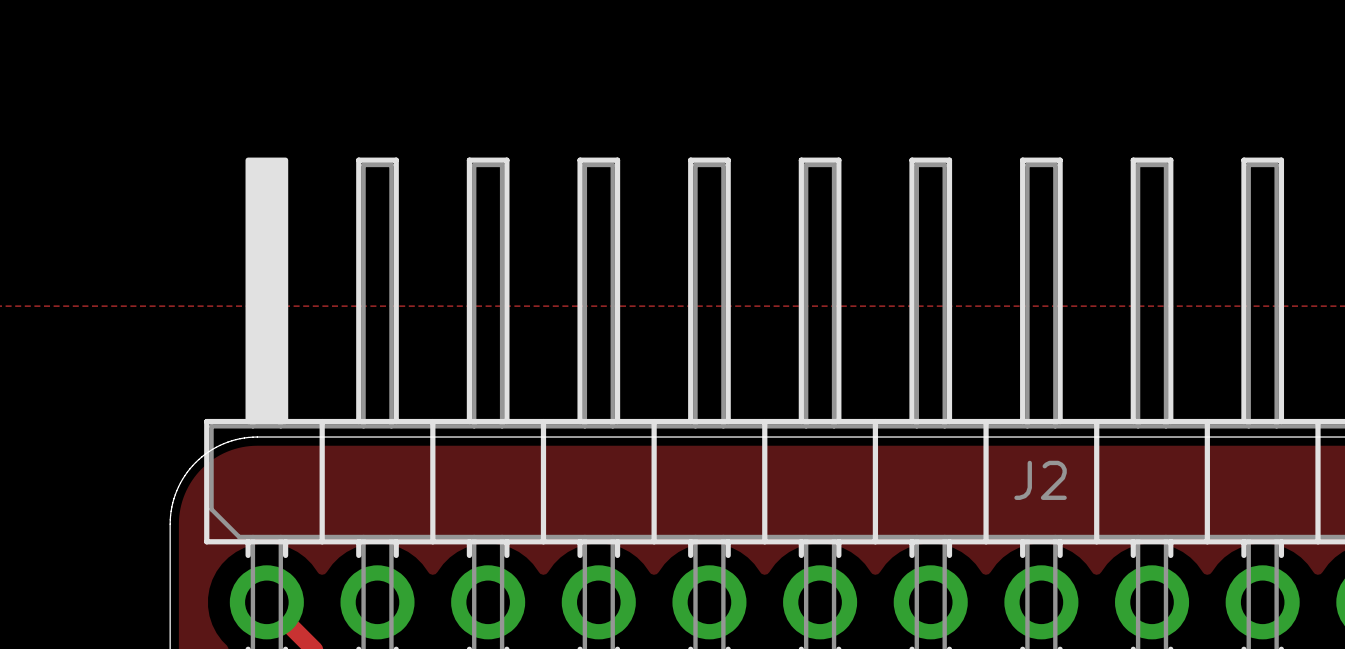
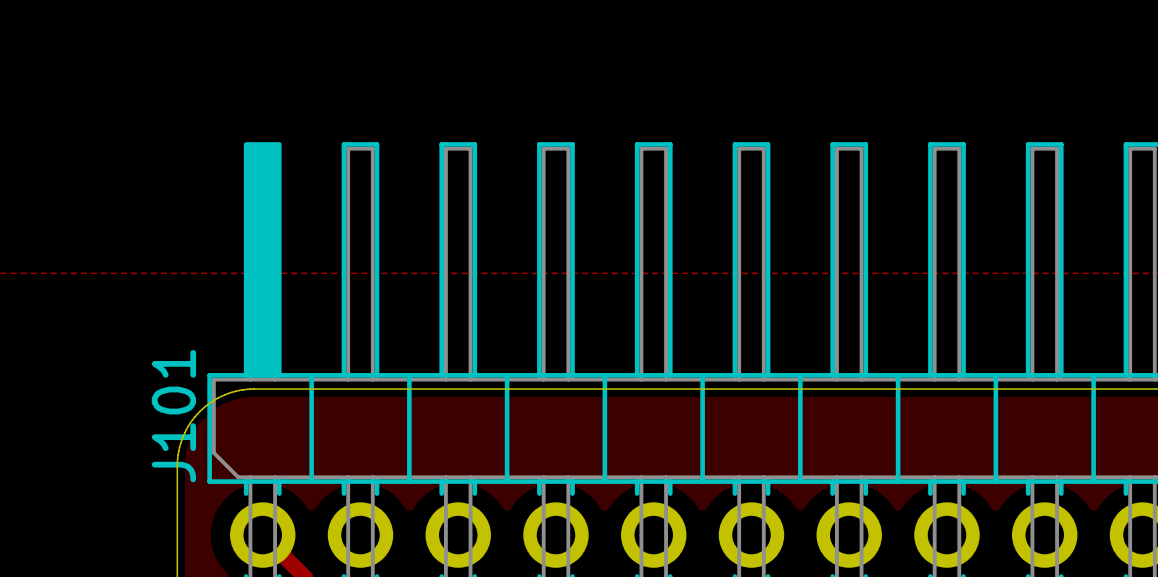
J2 name: J2 (1040, 480) -> J101 (173, 416)

